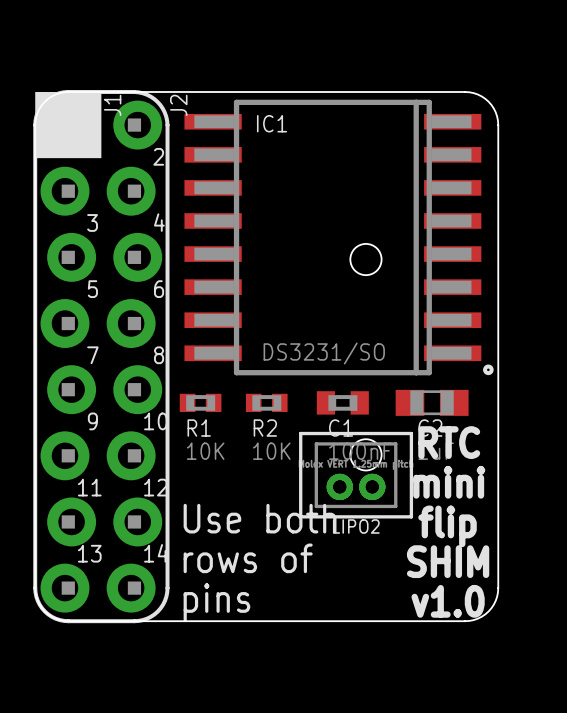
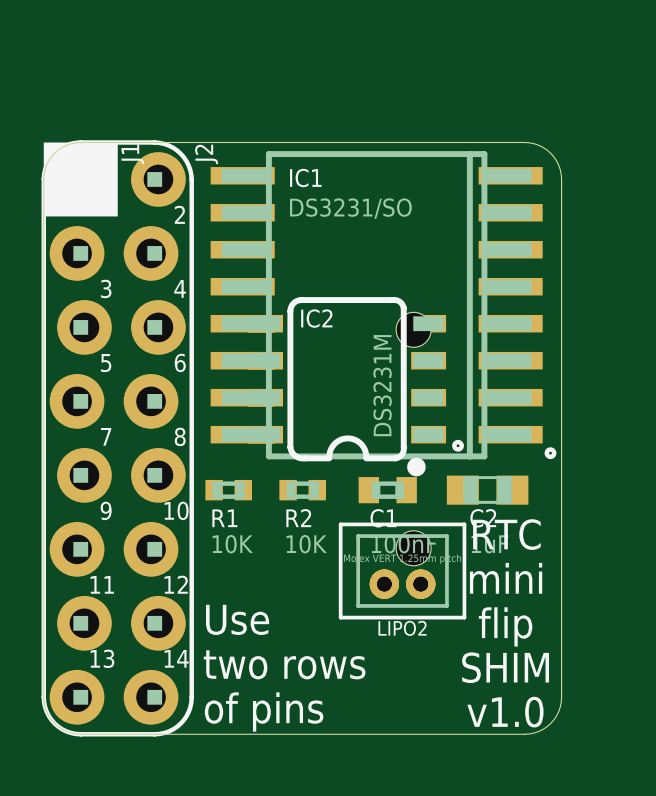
IC2: none -> DS3231M (347, 386)
IC1 value position: DS3231/SO (324, 353) -> DS3231/SO (350, 208)
drawing: none -> [452, 439, 464, 452]
text: Use both (260, 518) -> Use (237, 619)
text: rows of (248, 558) -> two rows (284, 664)
text: pins (216, 602) -> of pins (264, 711)

